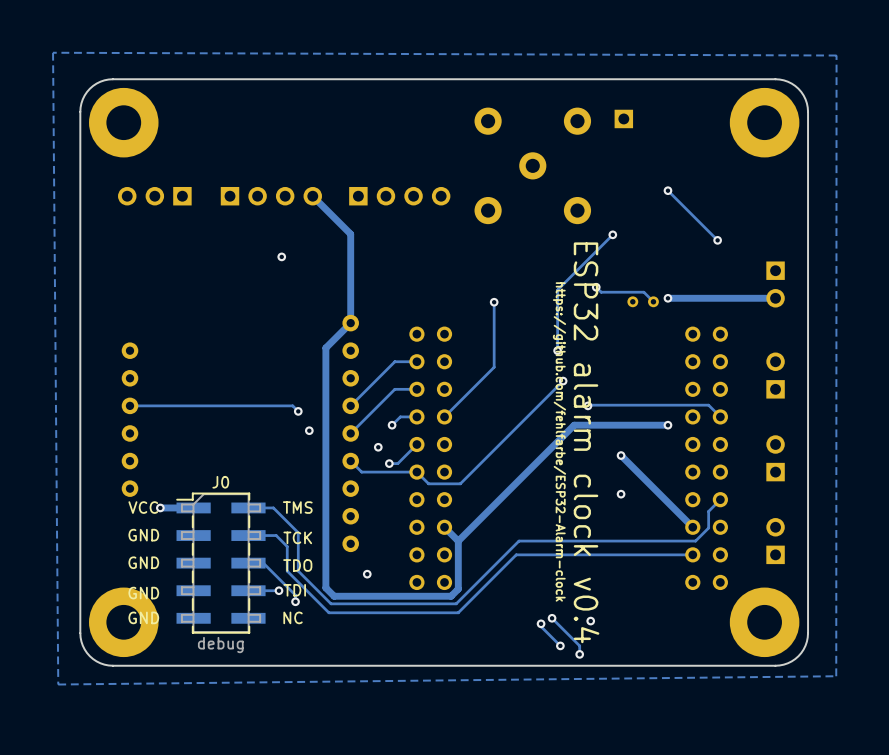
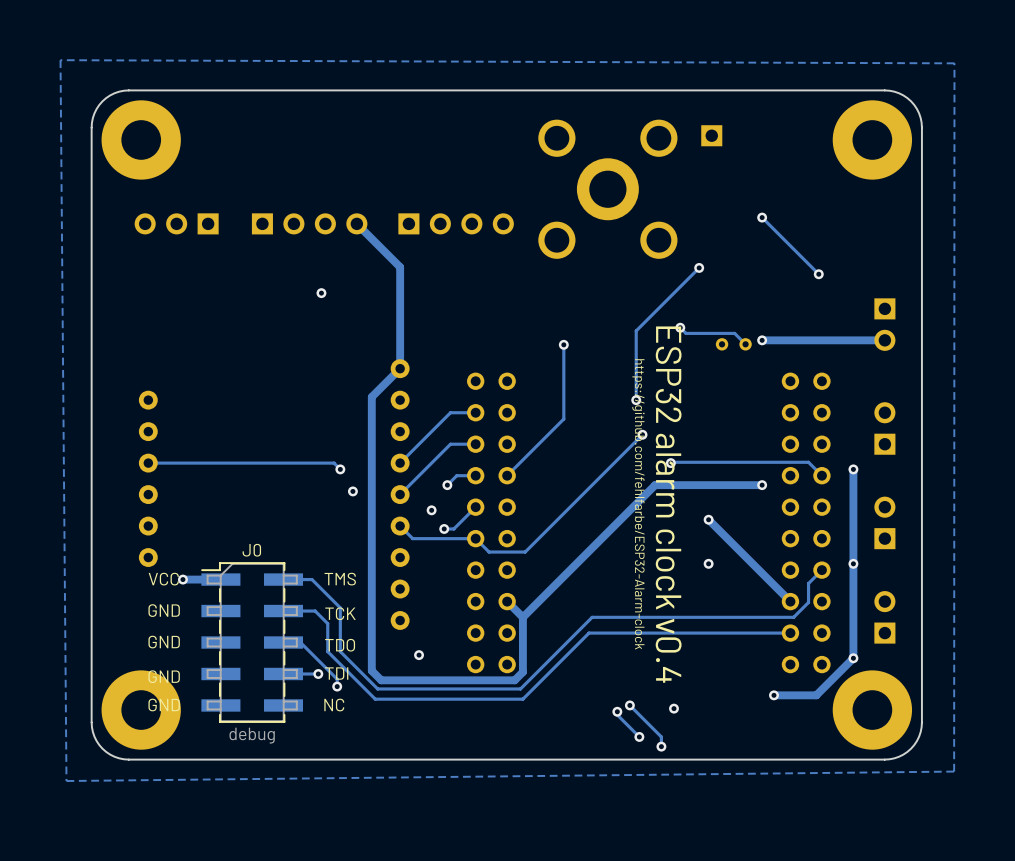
part footprint: [474, 107, 592, 225] -> [538, 119, 678, 259]
track: none -> (853, 469) (853, 658) (816, 695) (773, 695)
via: none -> (853, 469)
via: none -> (853, 563)
via: none -> (853, 658)
via: none -> (773, 695)

